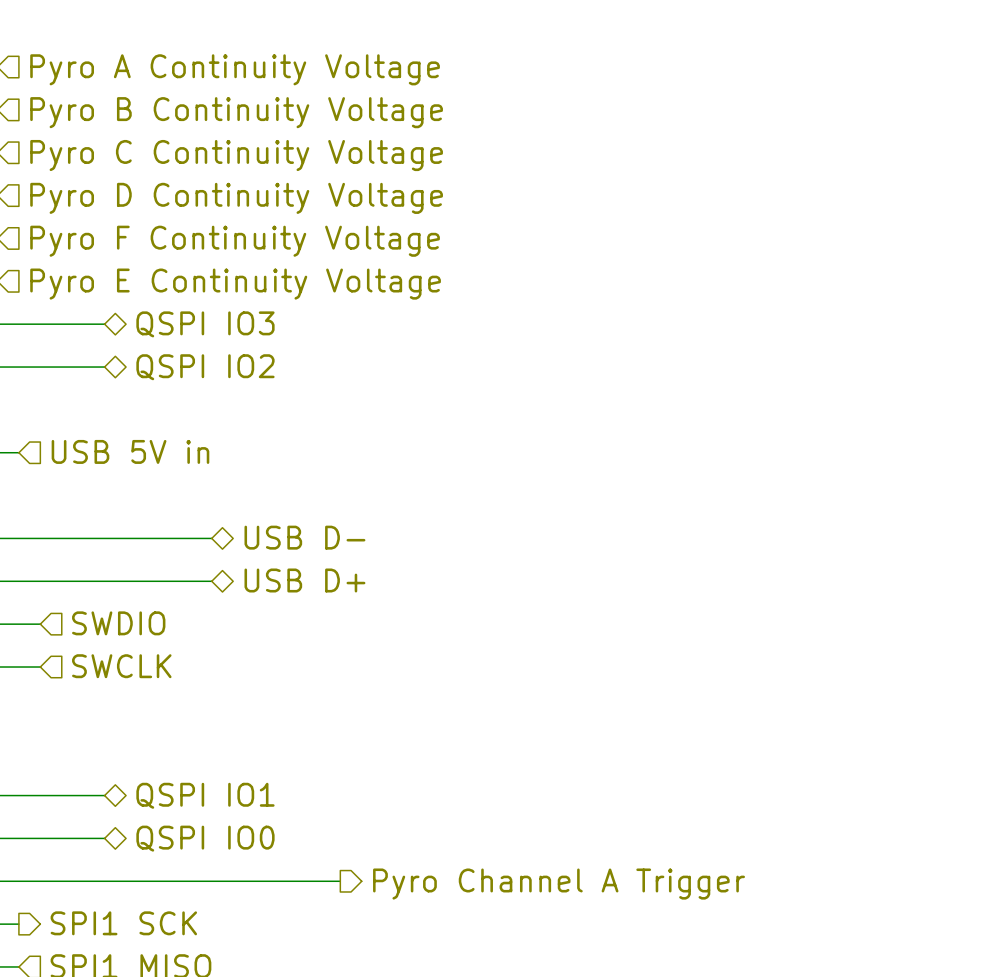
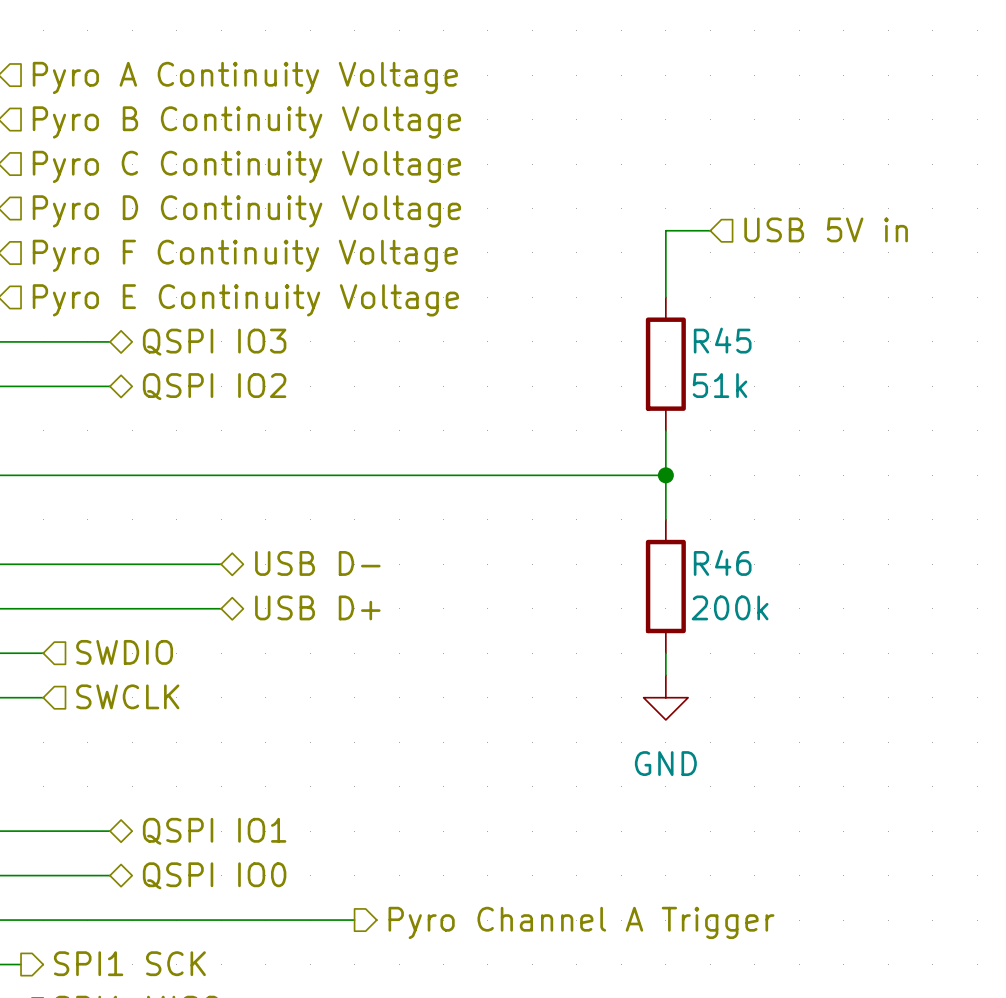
hierarchical label: none -> USB 5V in (826, 229)
wire: none -> (710, 230) (665, 230) (665, 297)
R45: none -> 51k (665, 364)
wire: none -> (665, 430) (665, 519)
hierarchical label: USB 5V in (130, 451) -> none
wire: none -> (21, 475) (665, 475)
junction: none -> (665, 475)
R46: none -> 200k (665, 586)
wire: none -> (665, 653) (665, 675)
power symbol: none -> GND (665, 697)

